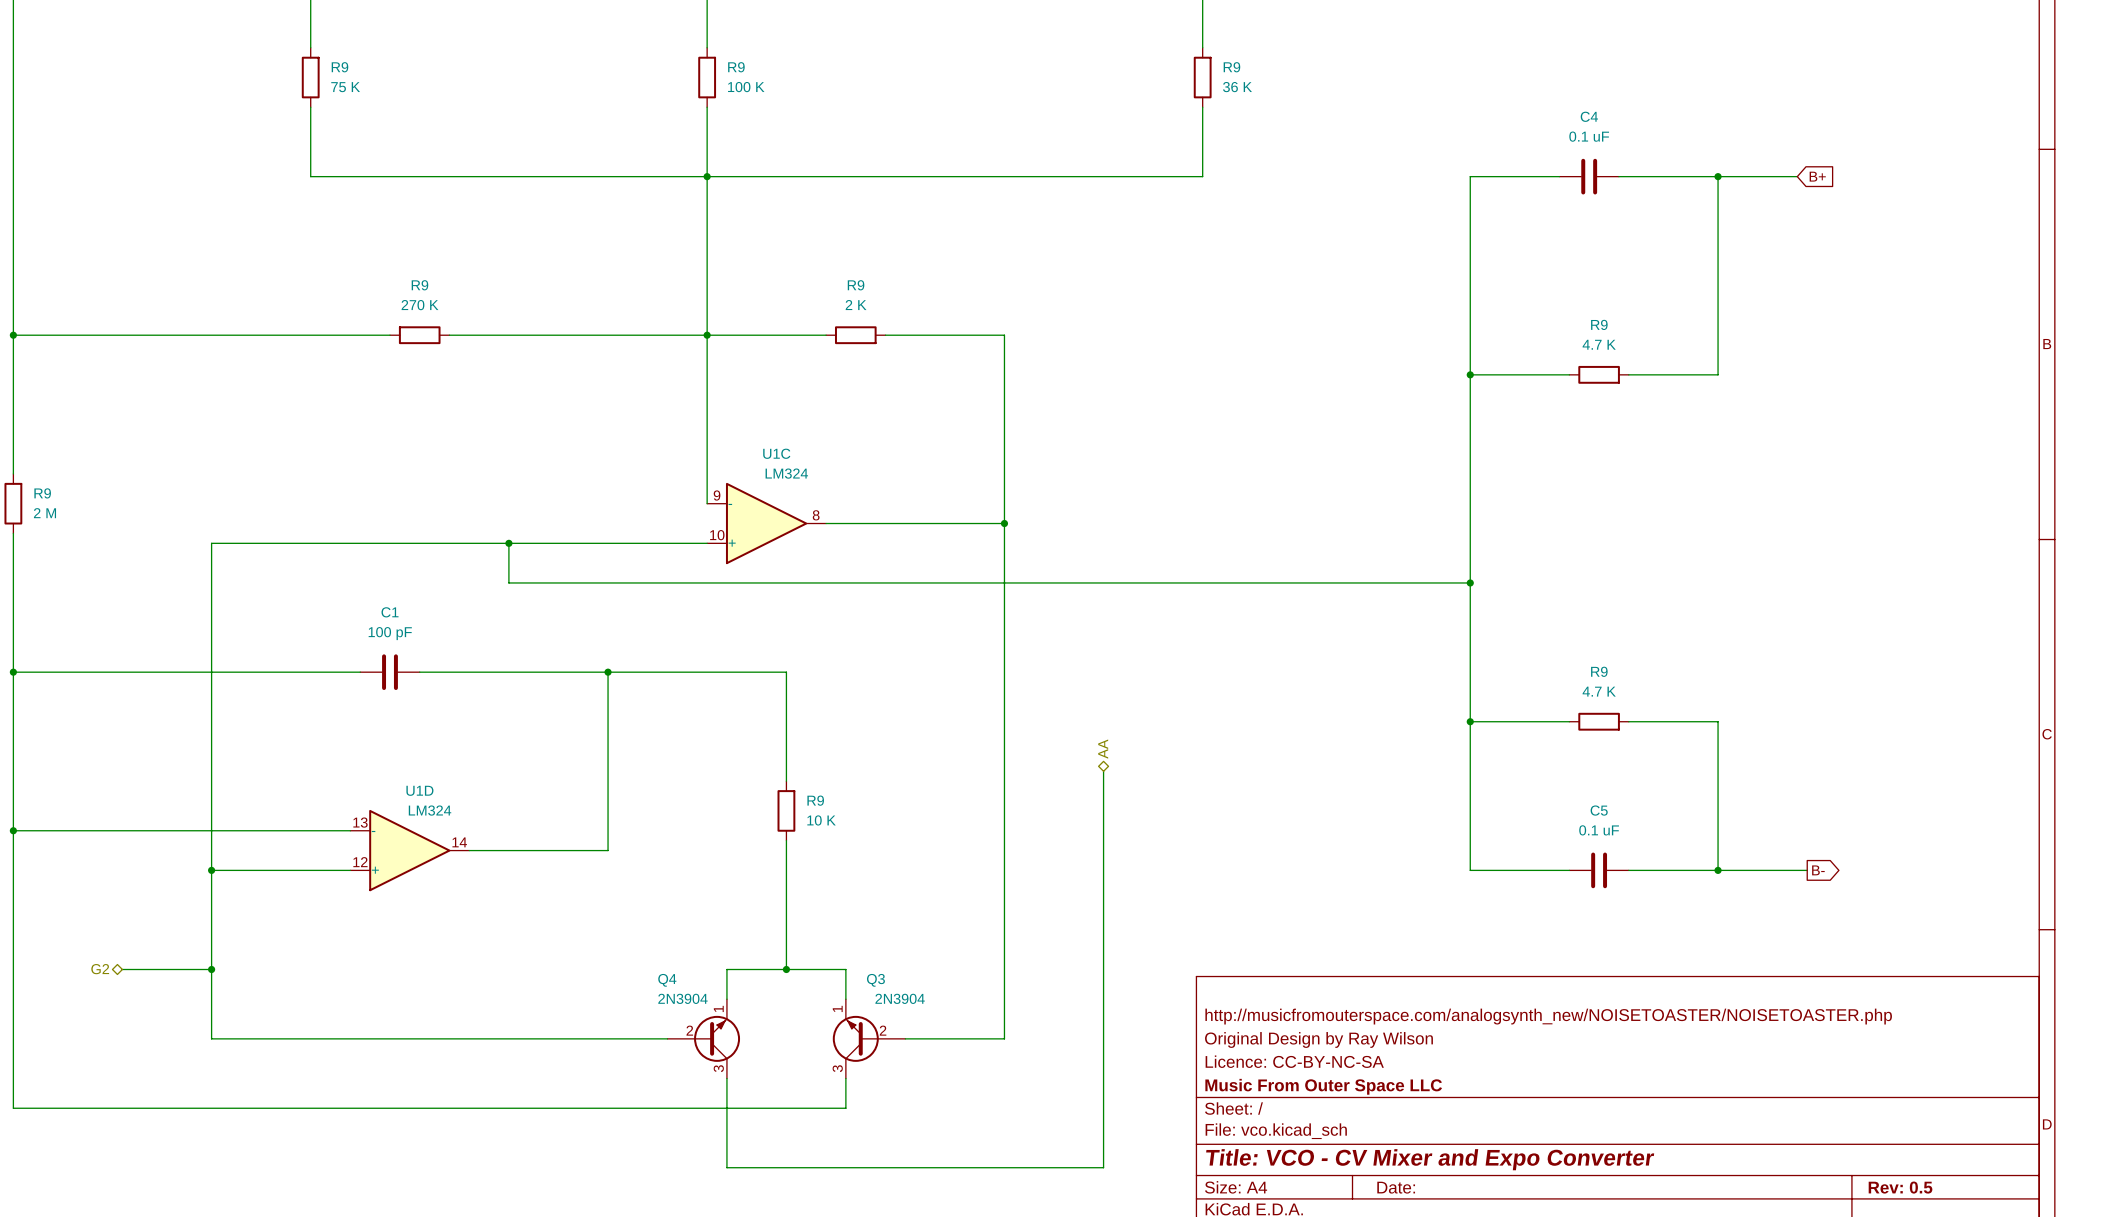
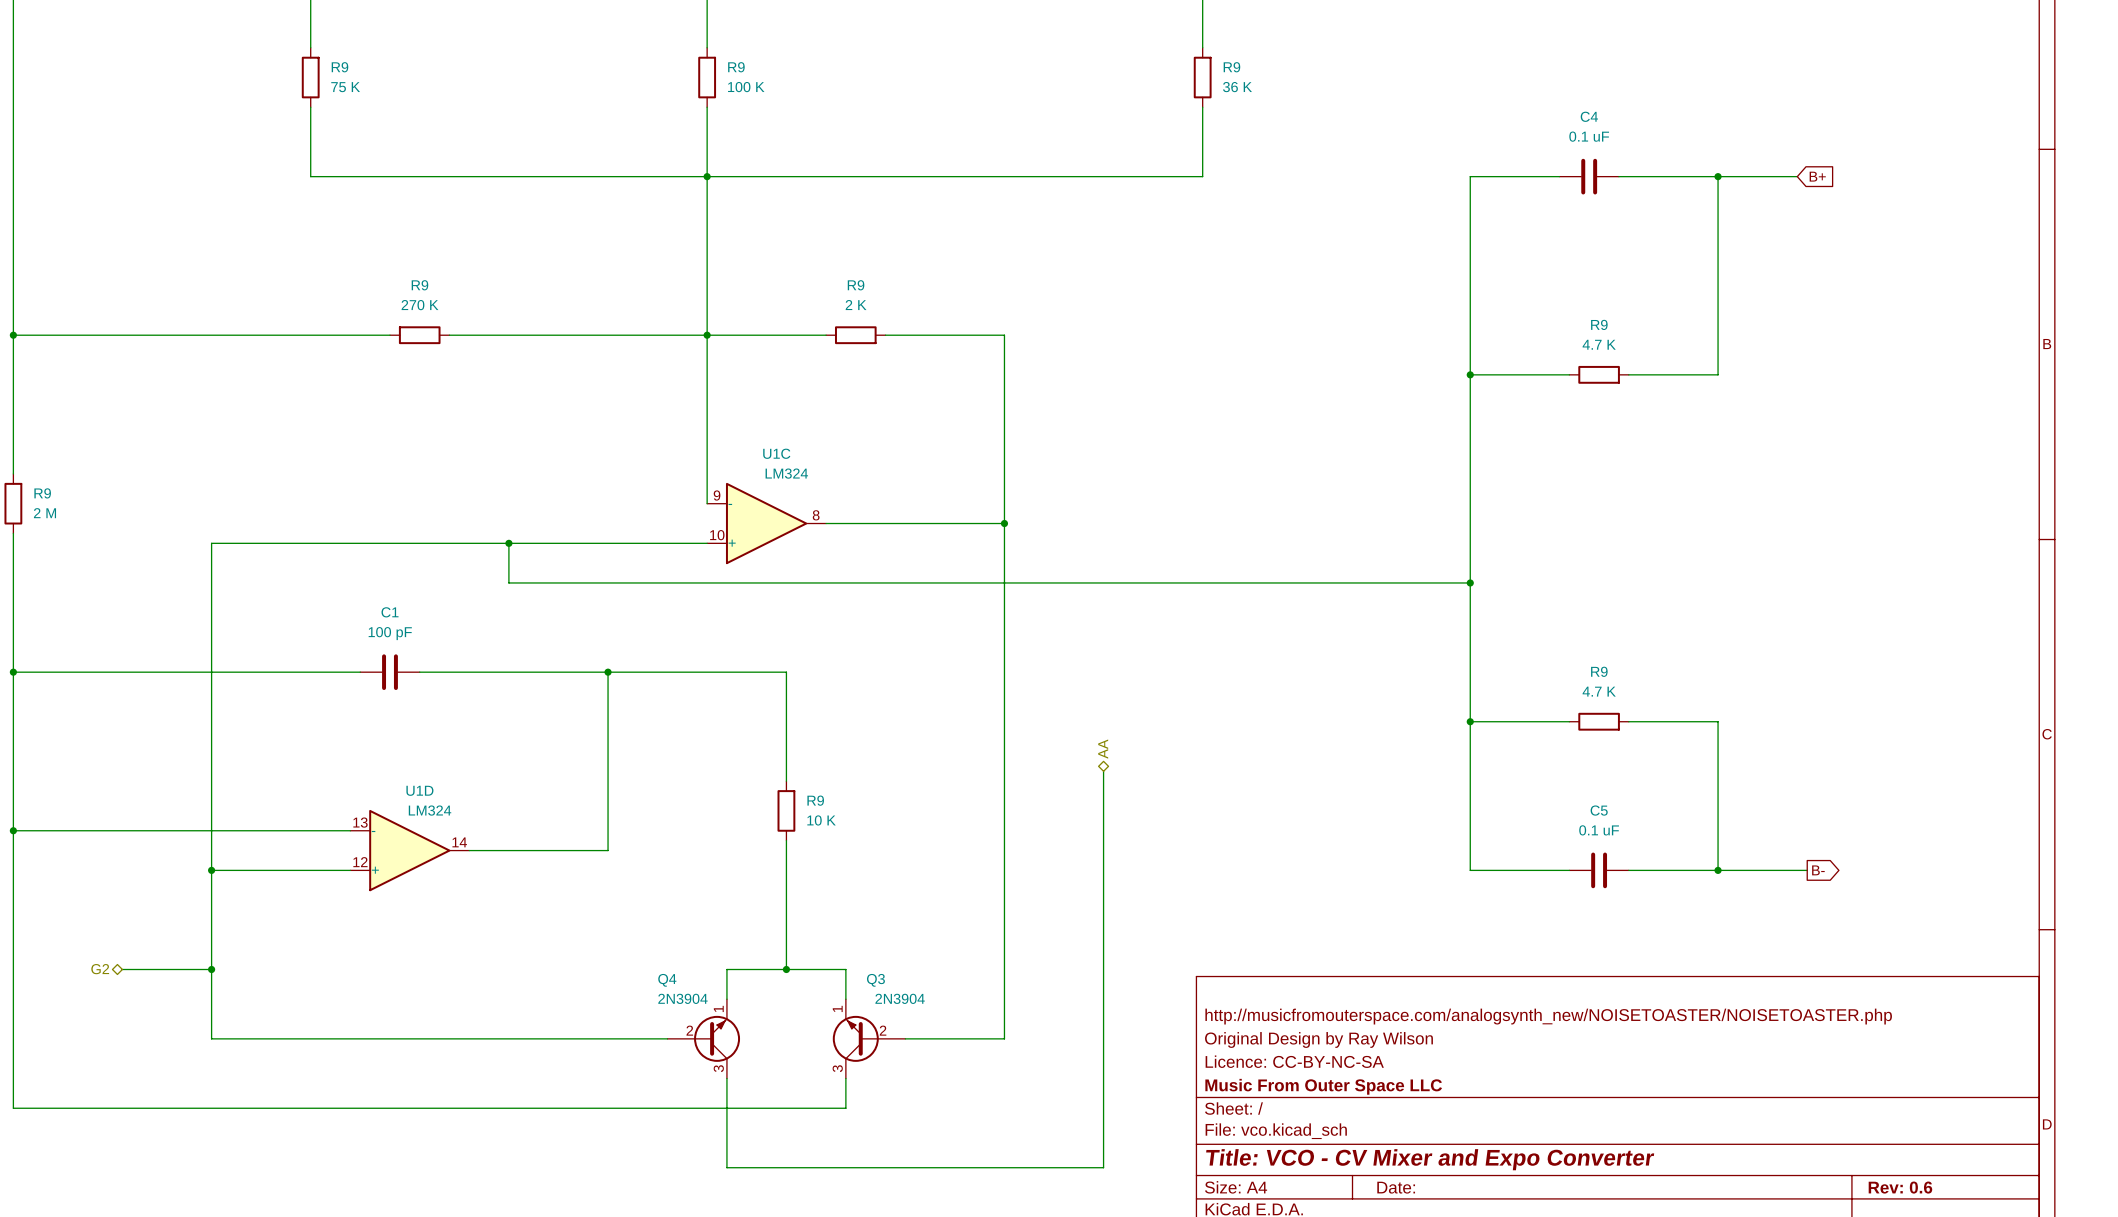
title block: Rev: 0.5 (1900, 1187) -> Rev: 0.6 (1900, 1187)

